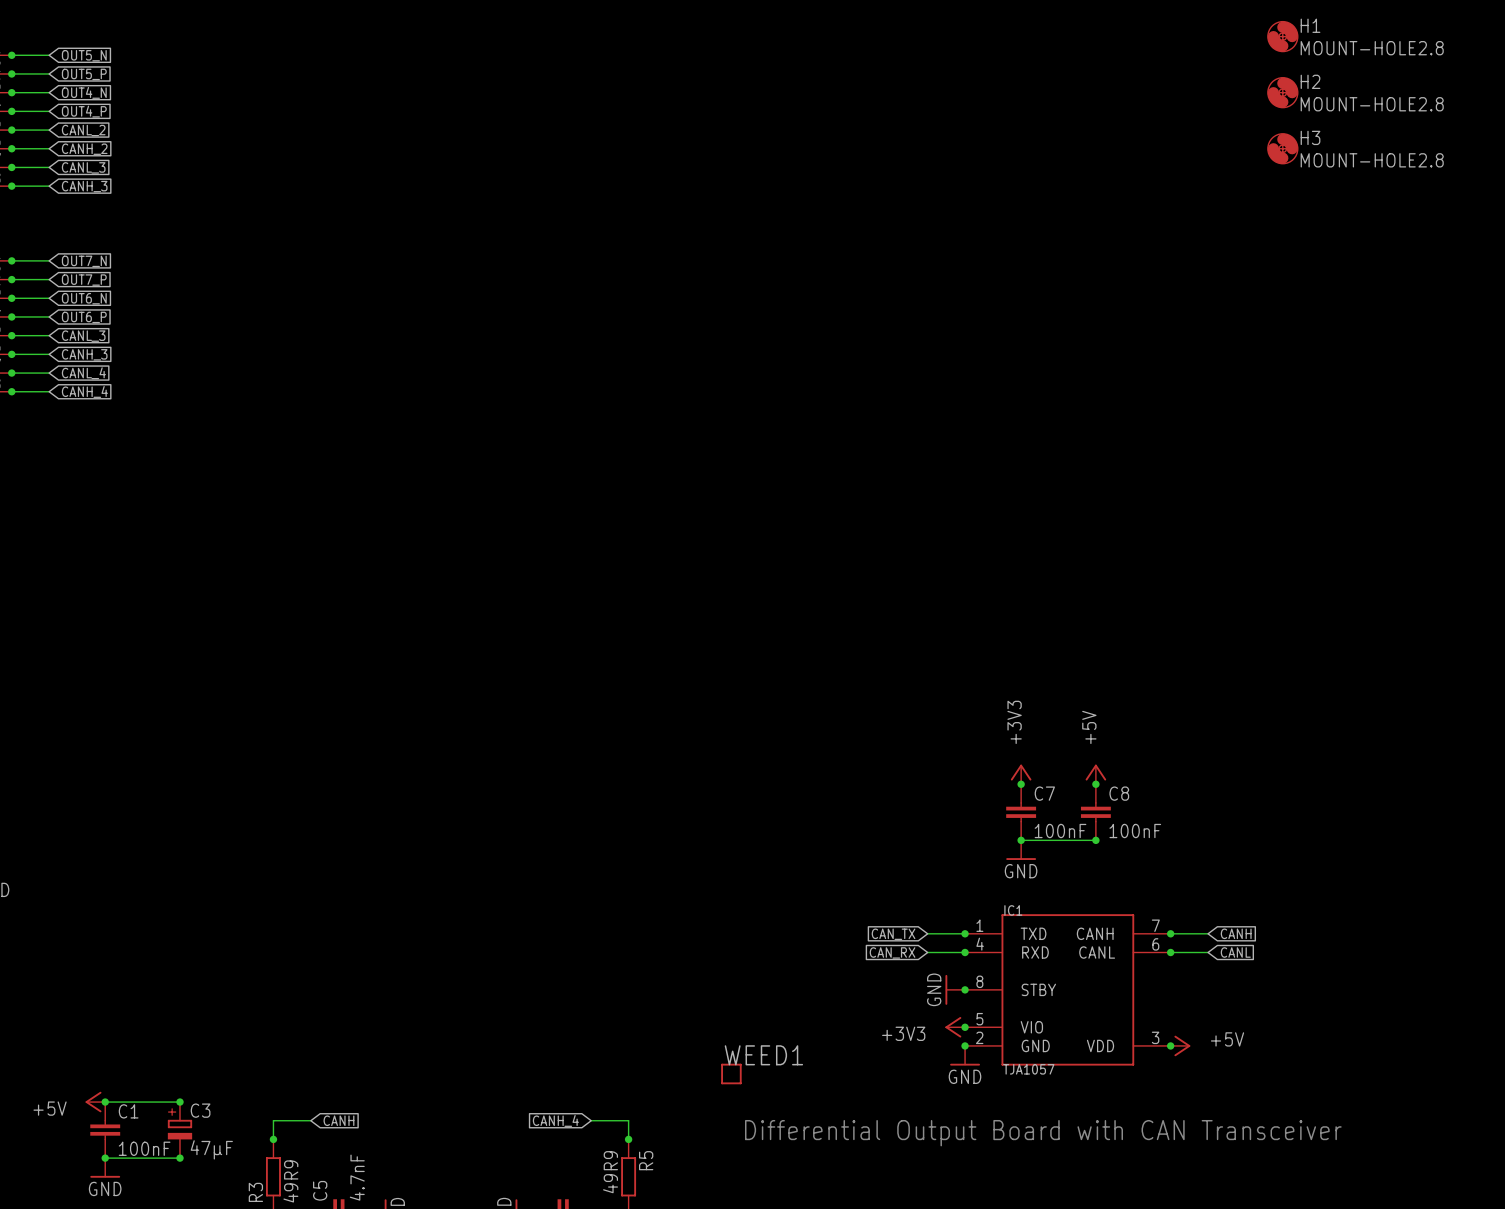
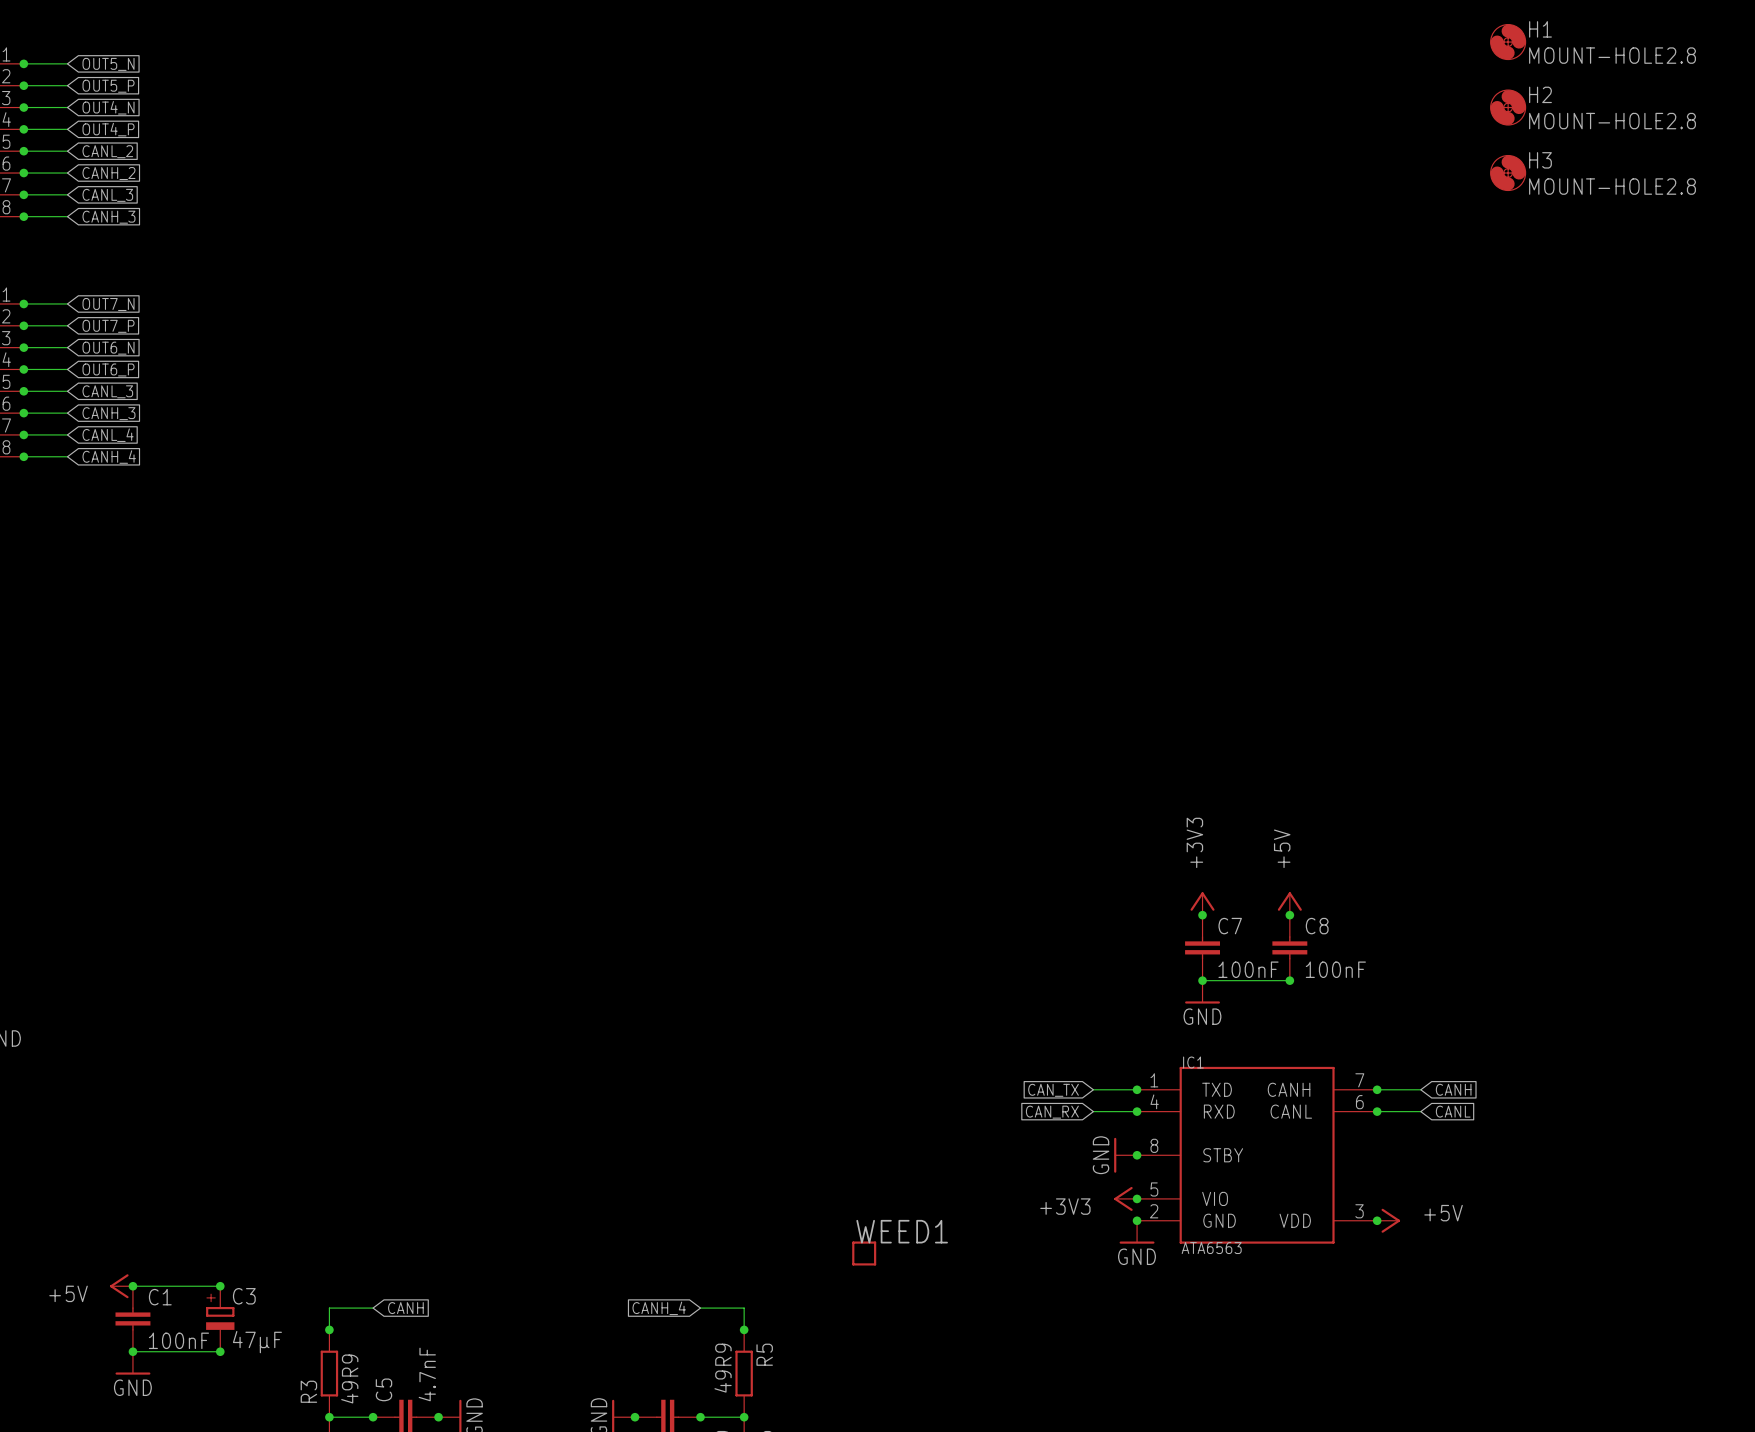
IC1 value: TJA1057 (1028, 1069) -> ATA6563 (1211, 1248)
text: Differential Output Board with CAN Transceiver (1043, 1133) -> none

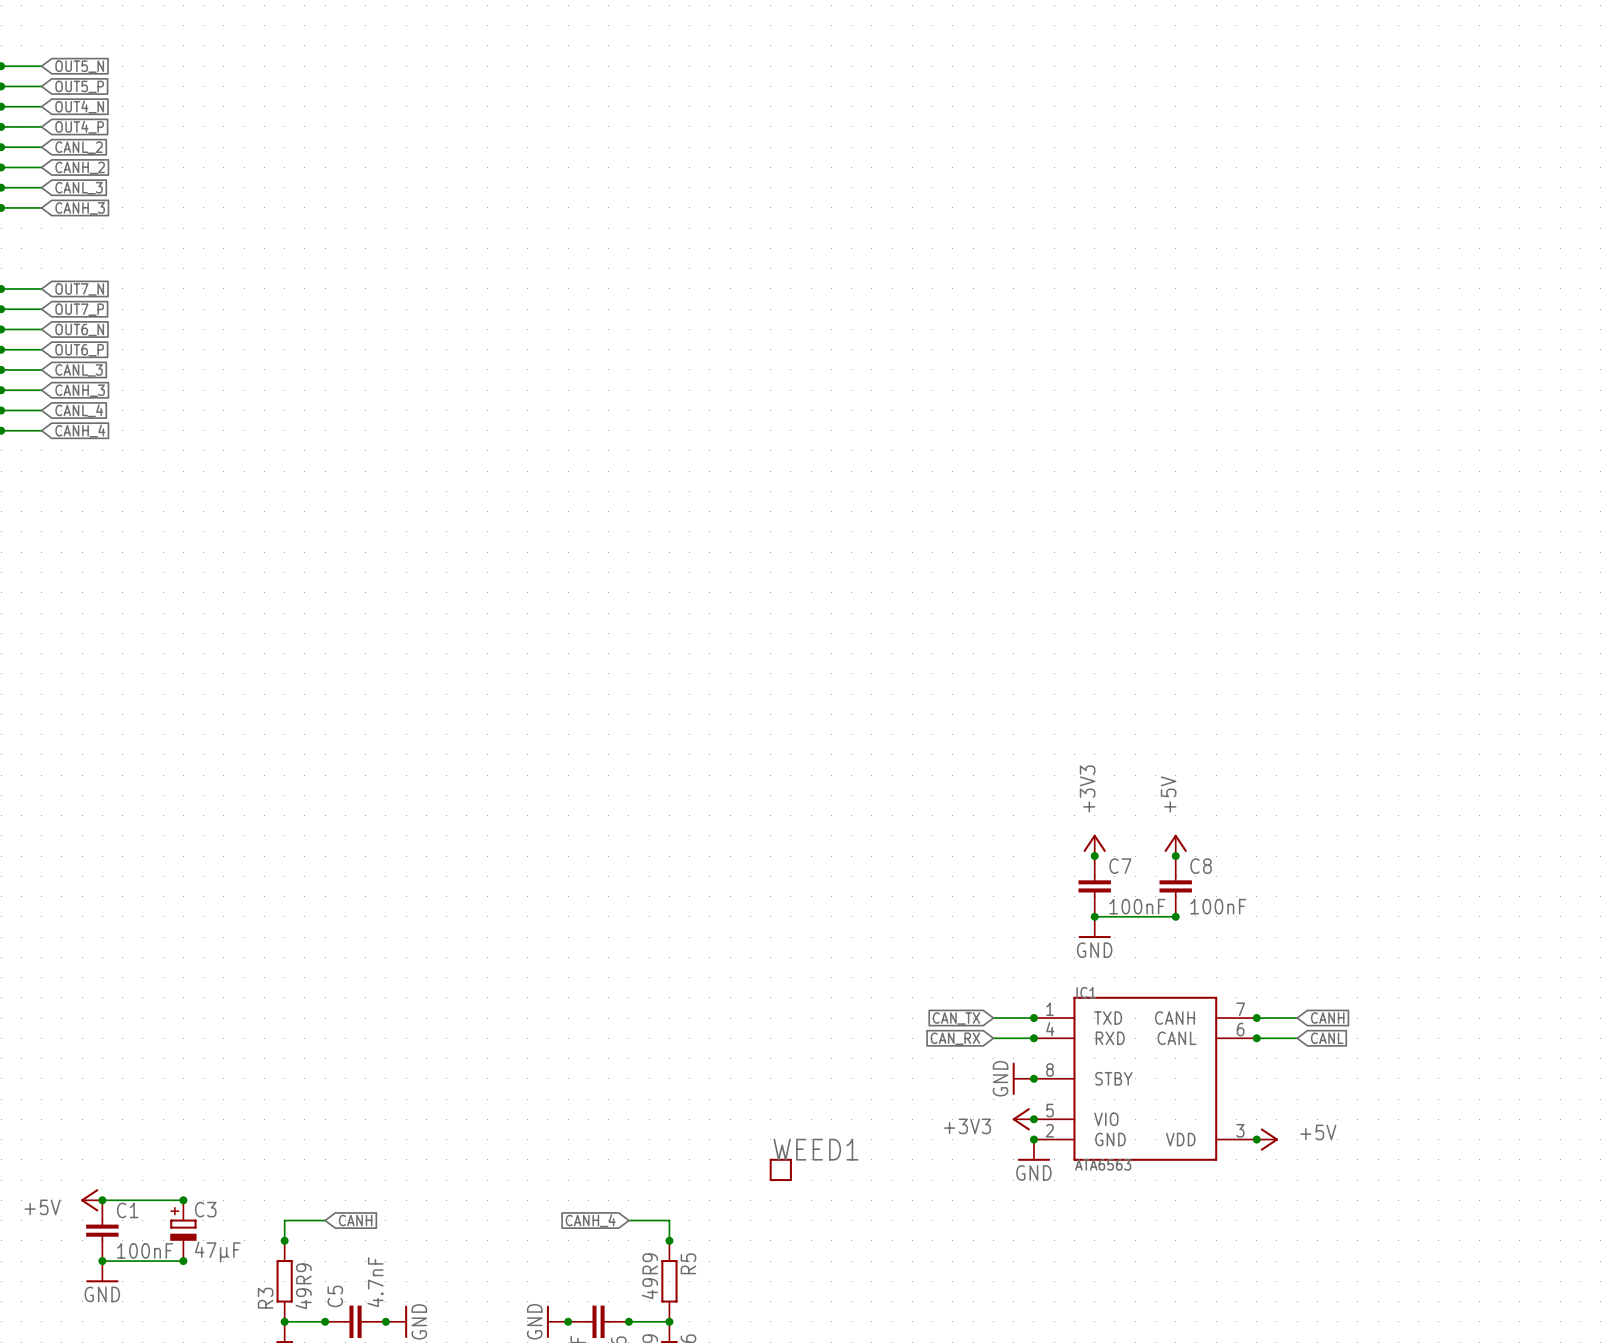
H1: MOUNT-HOLE2.8 (1508, 42) -> none
H2: MOUNT-HOLE2.8 (1508, 107) -> none
H3: MOUNT-HOLE2.8 (1508, 173) -> none

